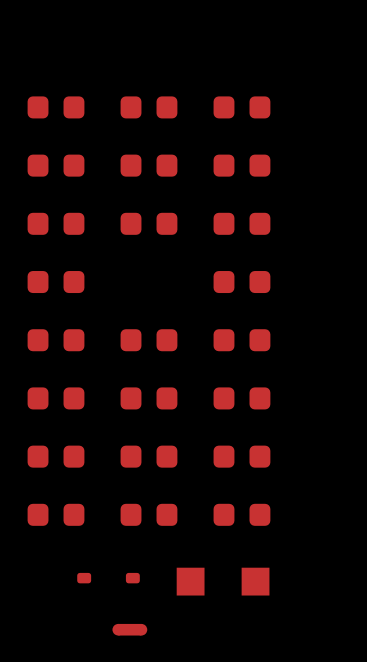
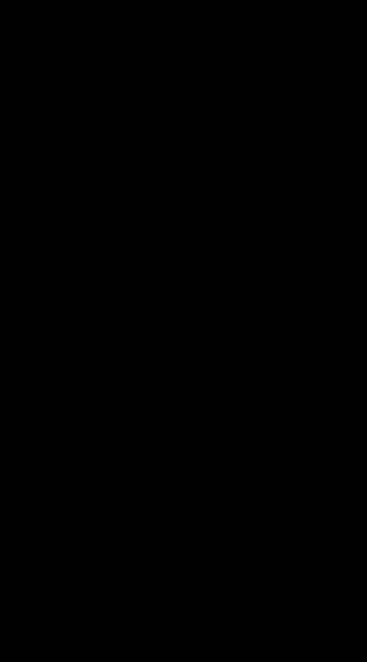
part: (56, 107) -> none
part: (148, 107) -> none
part: (241, 107) -> none
part: (56, 165) -> none
part: (148, 165) -> none
part: (241, 165) -> none
part: (56, 223) -> none
part: (148, 223) -> none
part: (241, 223) -> none
part: (56, 282) -> none
part: (241, 282) -> none
part: (56, 340) -> none
part: (148, 340) -> none
part: (241, 340) -> none
part: (56, 398) -> none
part: (148, 398) -> none
part: (241, 398) -> none
part: (56, 456) -> none
part: (148, 456) -> none
part: (241, 456) -> none
part: (56, 514) -> none
part: (148, 514) -> none
part: (241, 514) -> none
part: (108, 578) -> none
part: (223, 581) -> none
part: (129, 629) -> none

